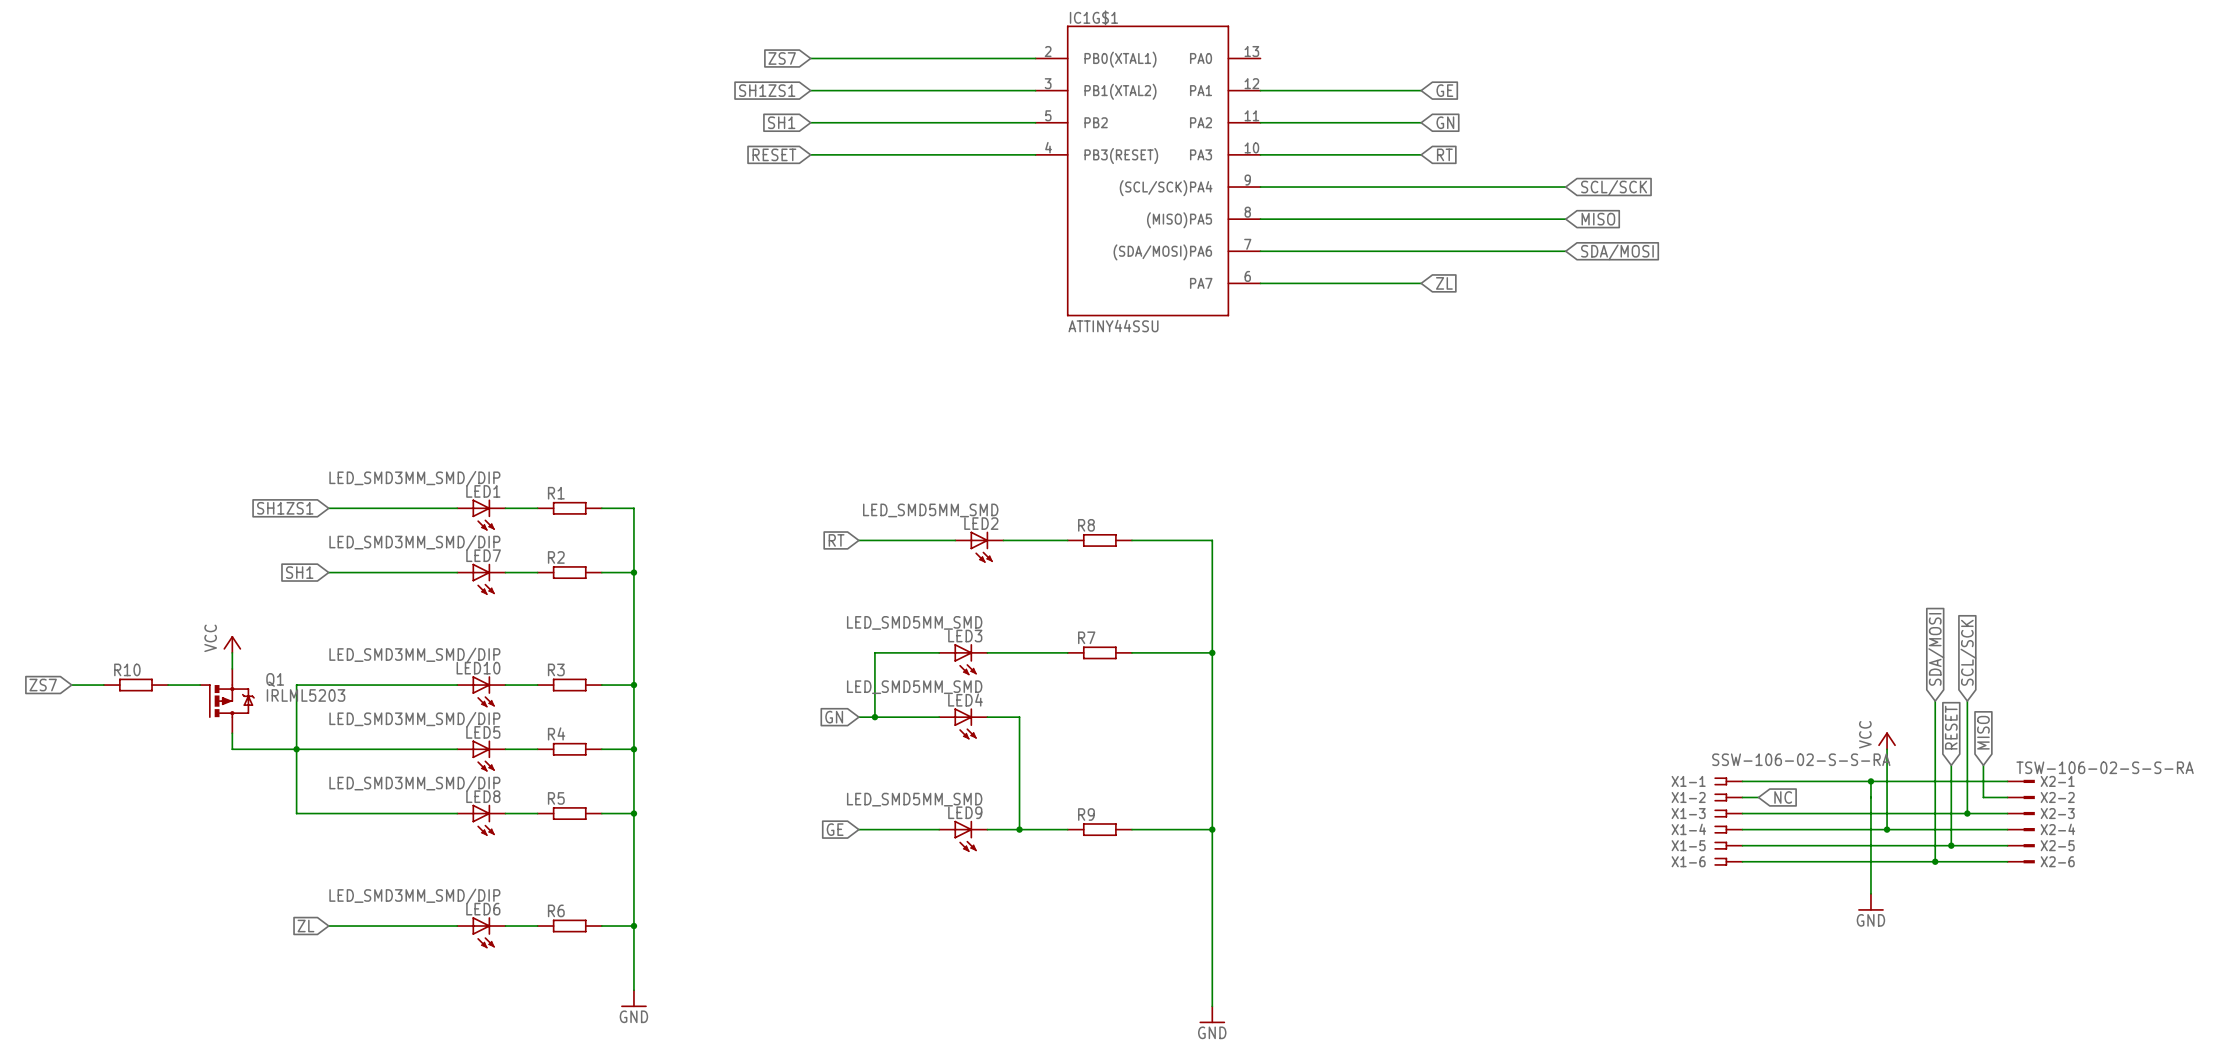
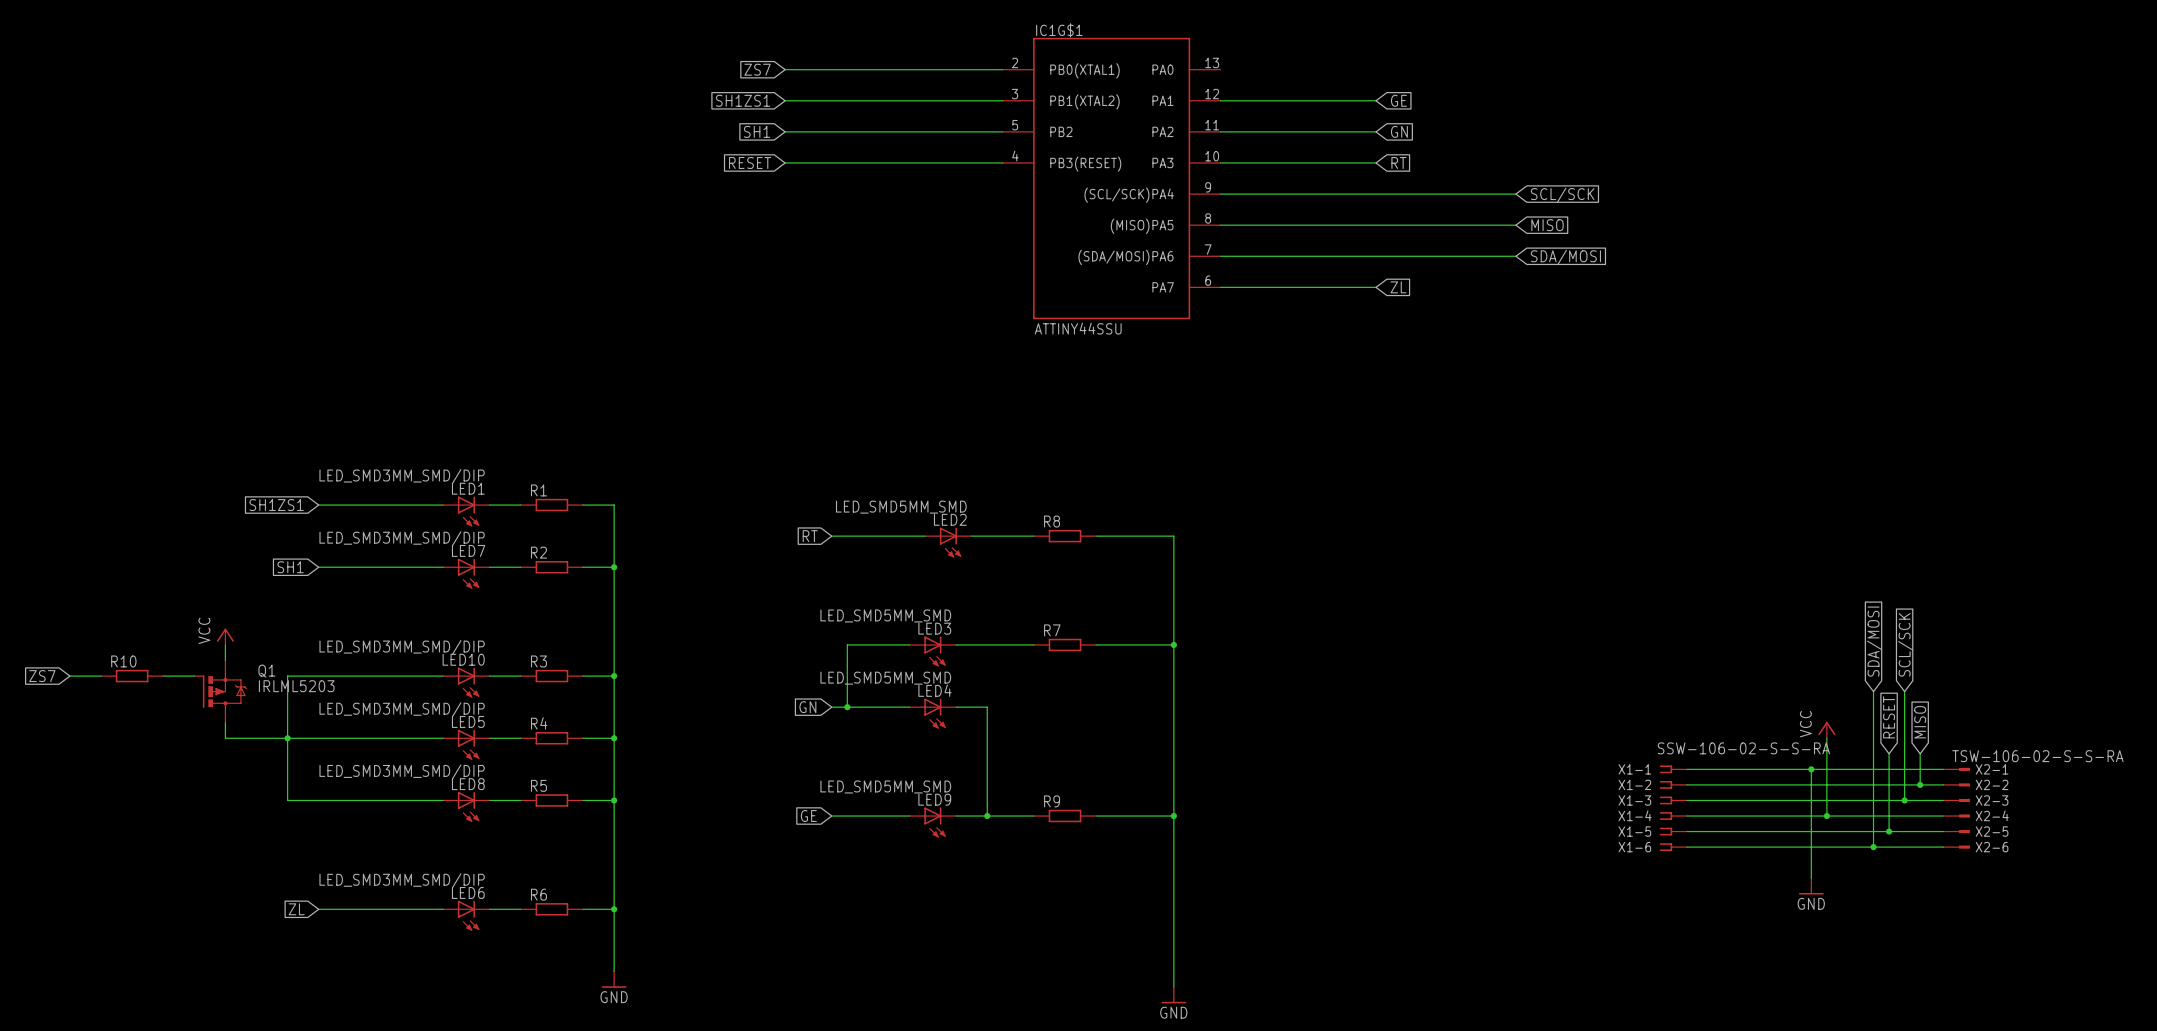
wire: none -> (1702, 784) (1920, 784)
global label: NC (1783, 797) -> none
junction: none -> (1920, 784)

